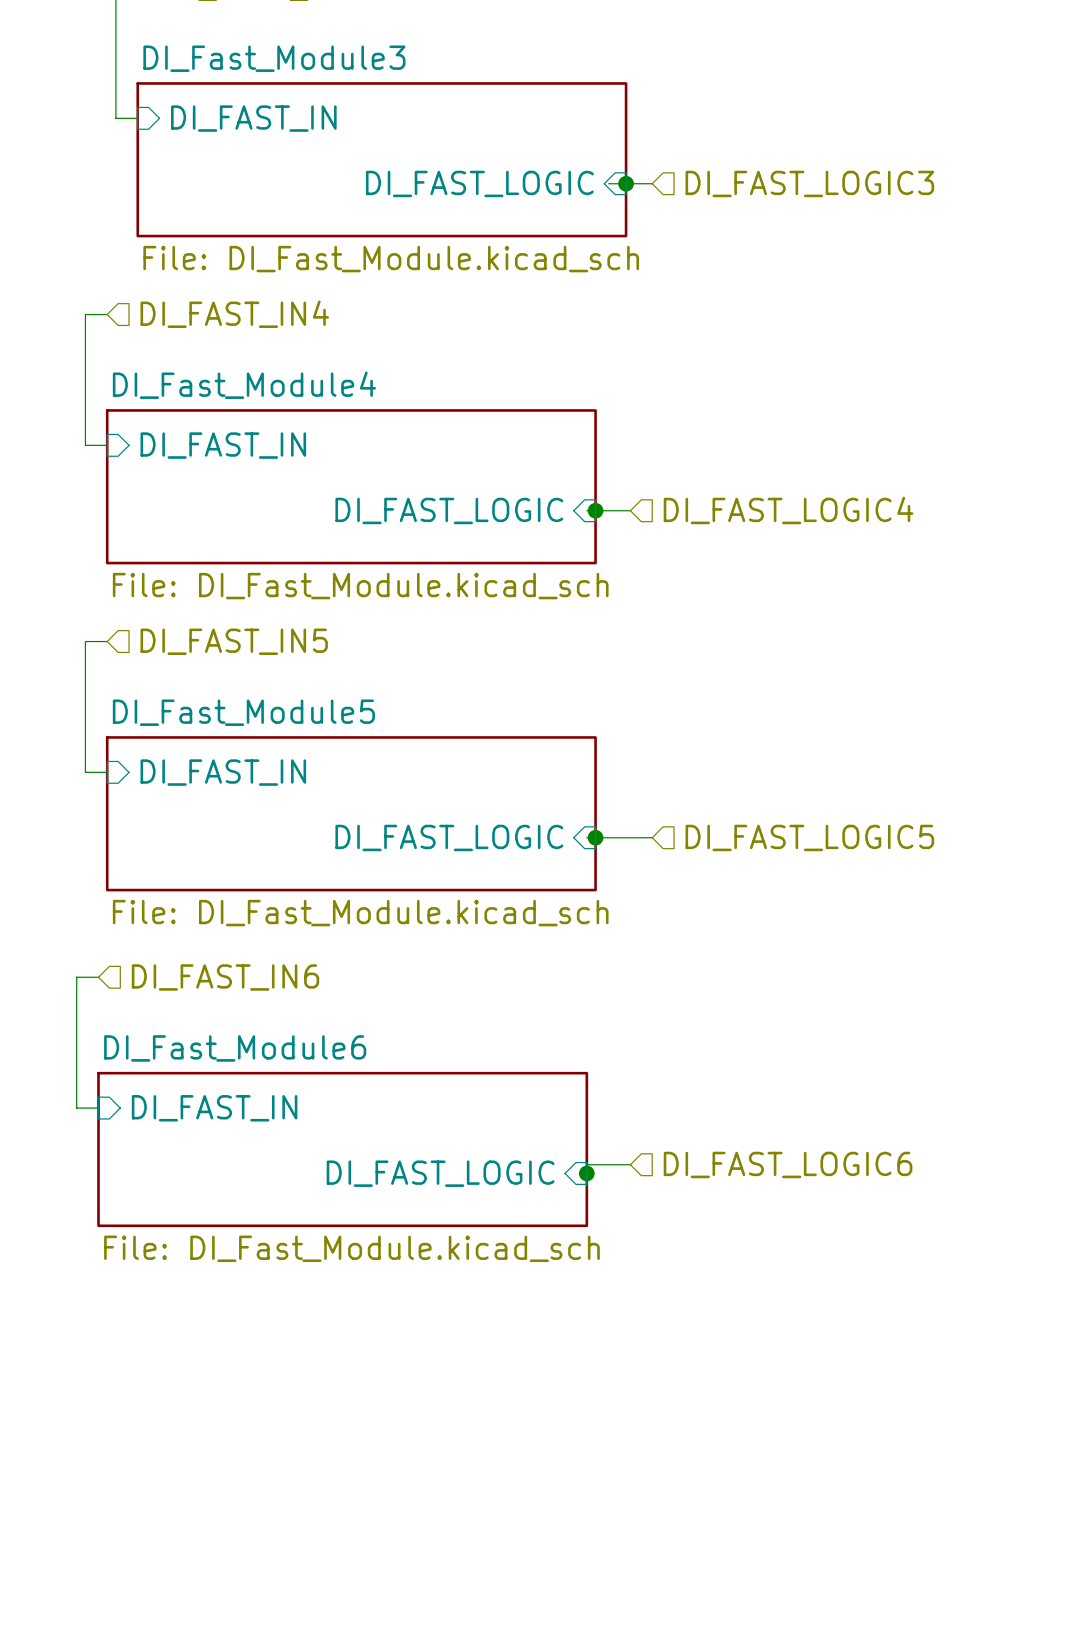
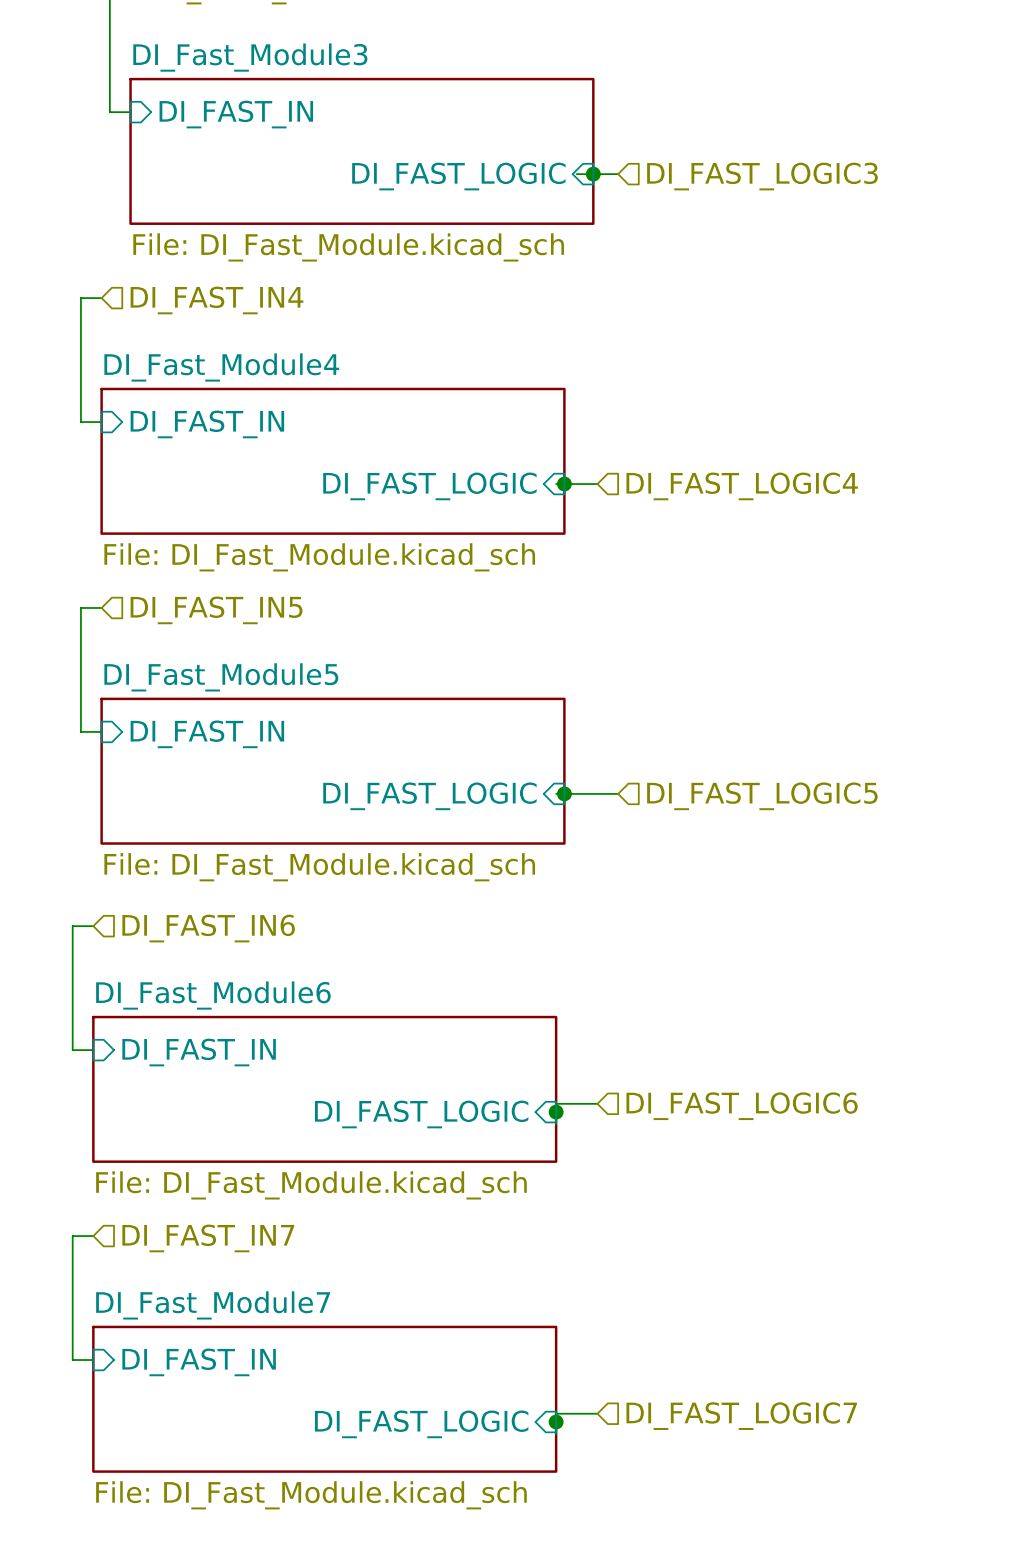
wire: none -> (93, 1236) (72, 1236) (72, 1360) (93, 1360)
hierarchical label: none -> DI_FAST_IN7 (208, 1238)
sheet pin: none -> DI_FAST_IN (199, 1362)
sheet DI_Fast_Module7: none -> File: DI_Fast_Module.kicad_sch (324, 1399)
wire: none -> (597, 1413) (556, 1413) (556, 1434)
hierarchical label: none -> DI_FAST_LOGIC7 (741, 1416)
sheet pin: none -> DI_FAST_LOGIC (421, 1424)
junction: none -> (556, 1421)

